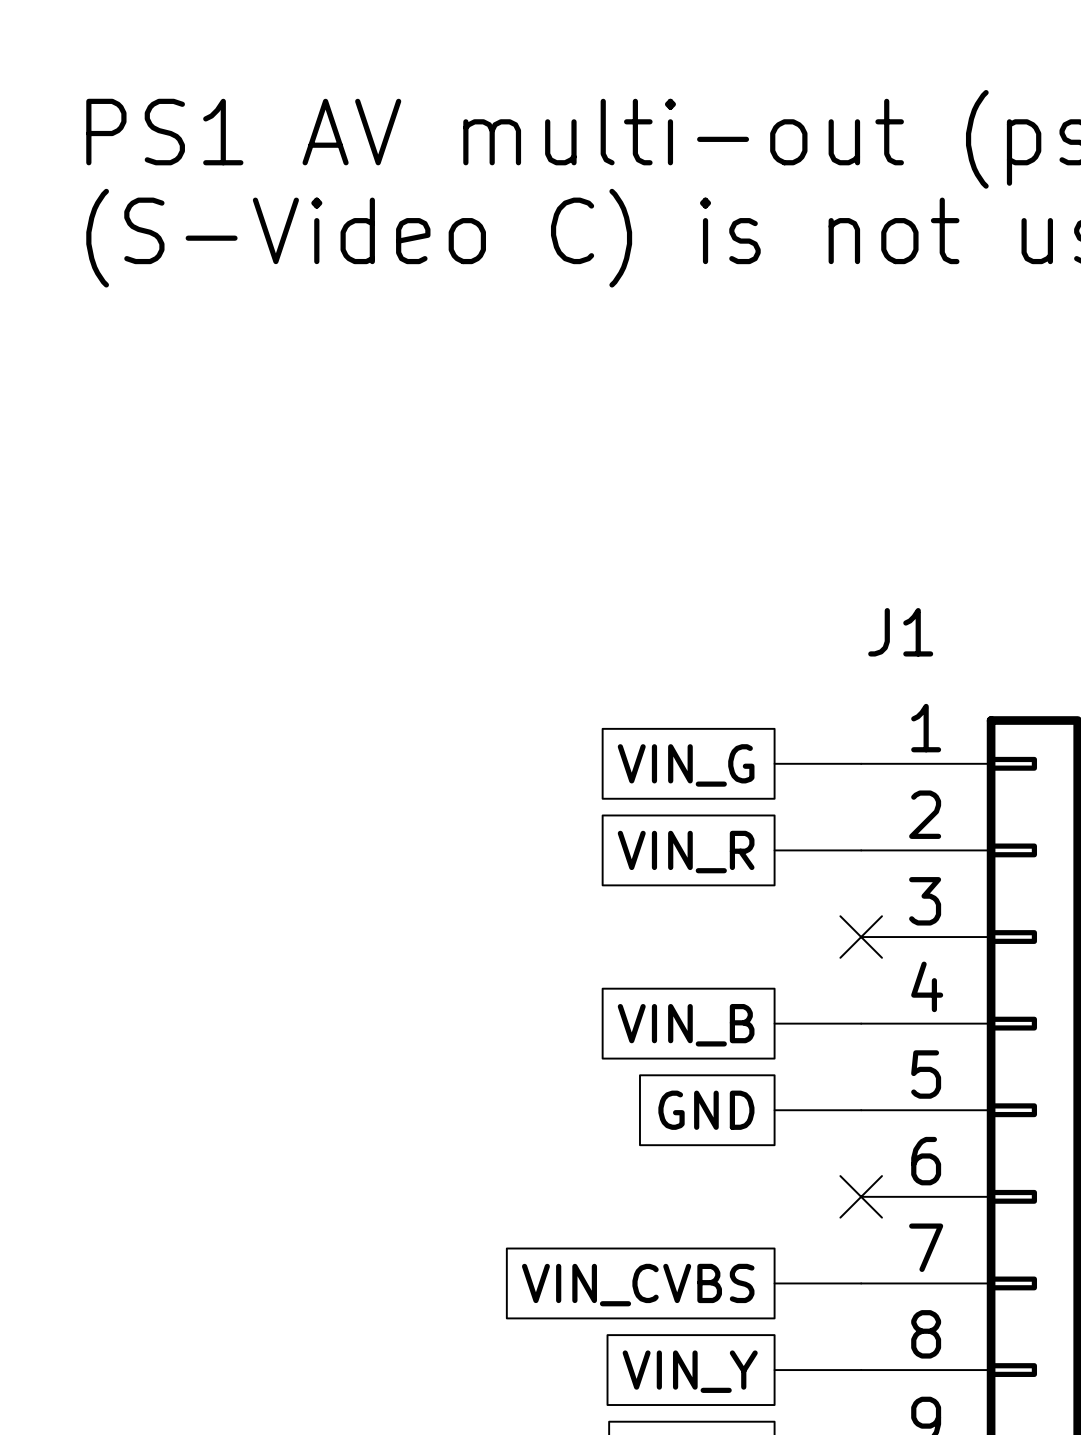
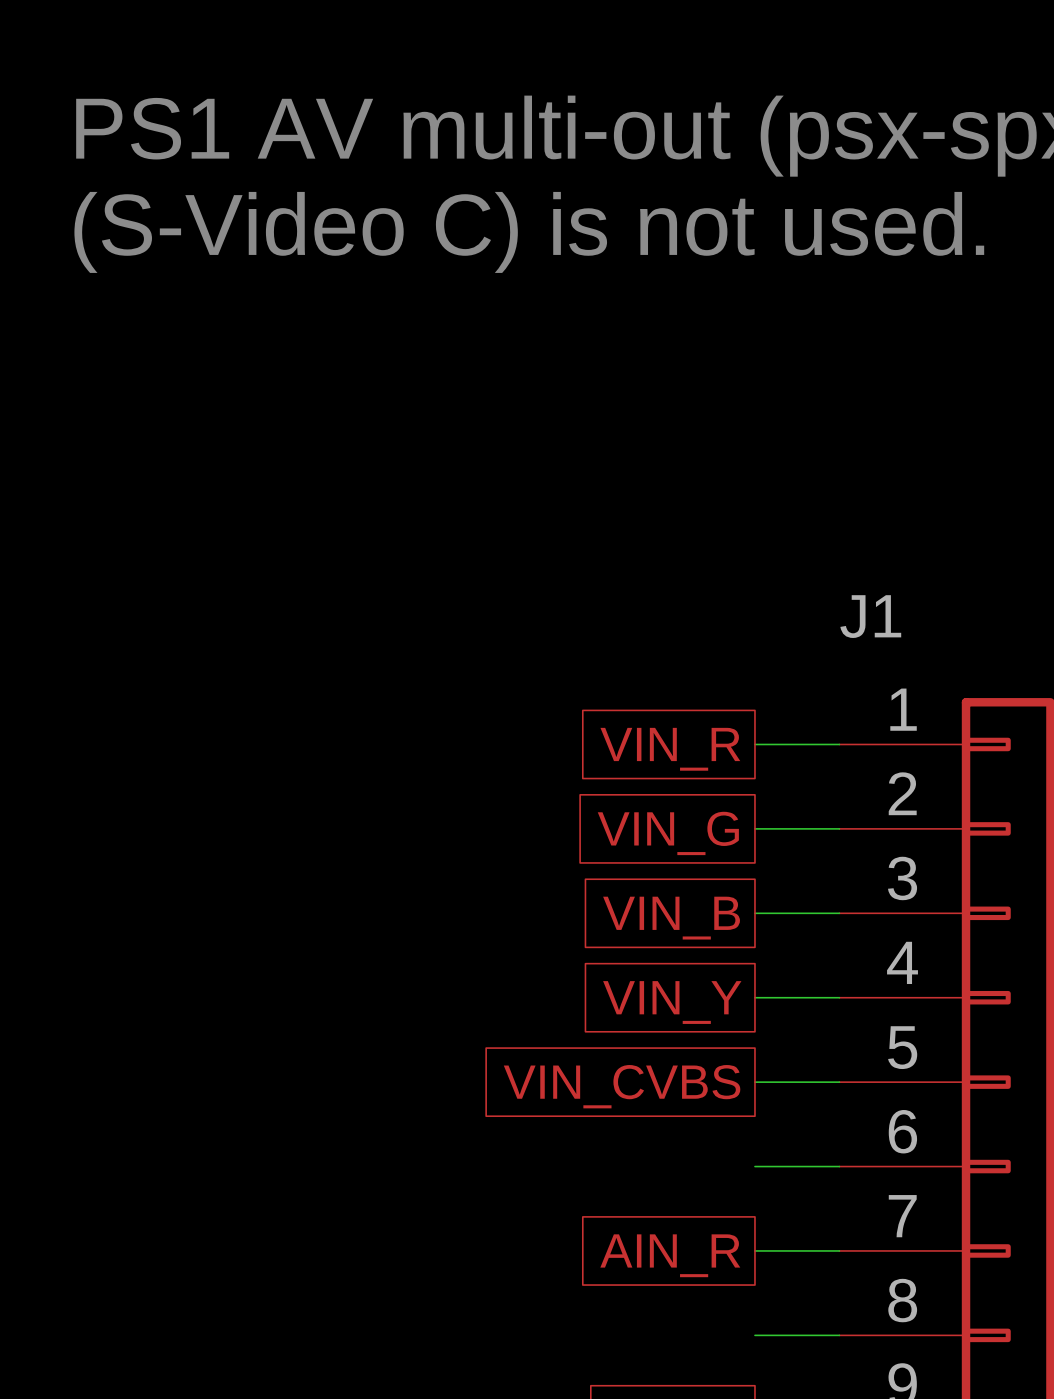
global label: VIN_G (686, 765) -> VIN_R (670, 749)
global label: VIN_R (686, 852) -> VIN_G (668, 833)
wire: none -> (754, 913) (839, 913)
no-connect mark: (861, 937) -> none
global label: none -> VIN_B (671, 918)
global label: VIN_B (686, 1025) -> VIN_Y (672, 1002)
global label: GND (706, 1110) -> VIN_CVBS (622, 1086)
wire: none -> (754, 1166) (839, 1166)
no-connect mark: (861, 1196) -> none
global label: VIN_CVBS (638, 1285) -> AIN_R (670, 1255)
global label: VIN_Y (690, 1371) -> none

